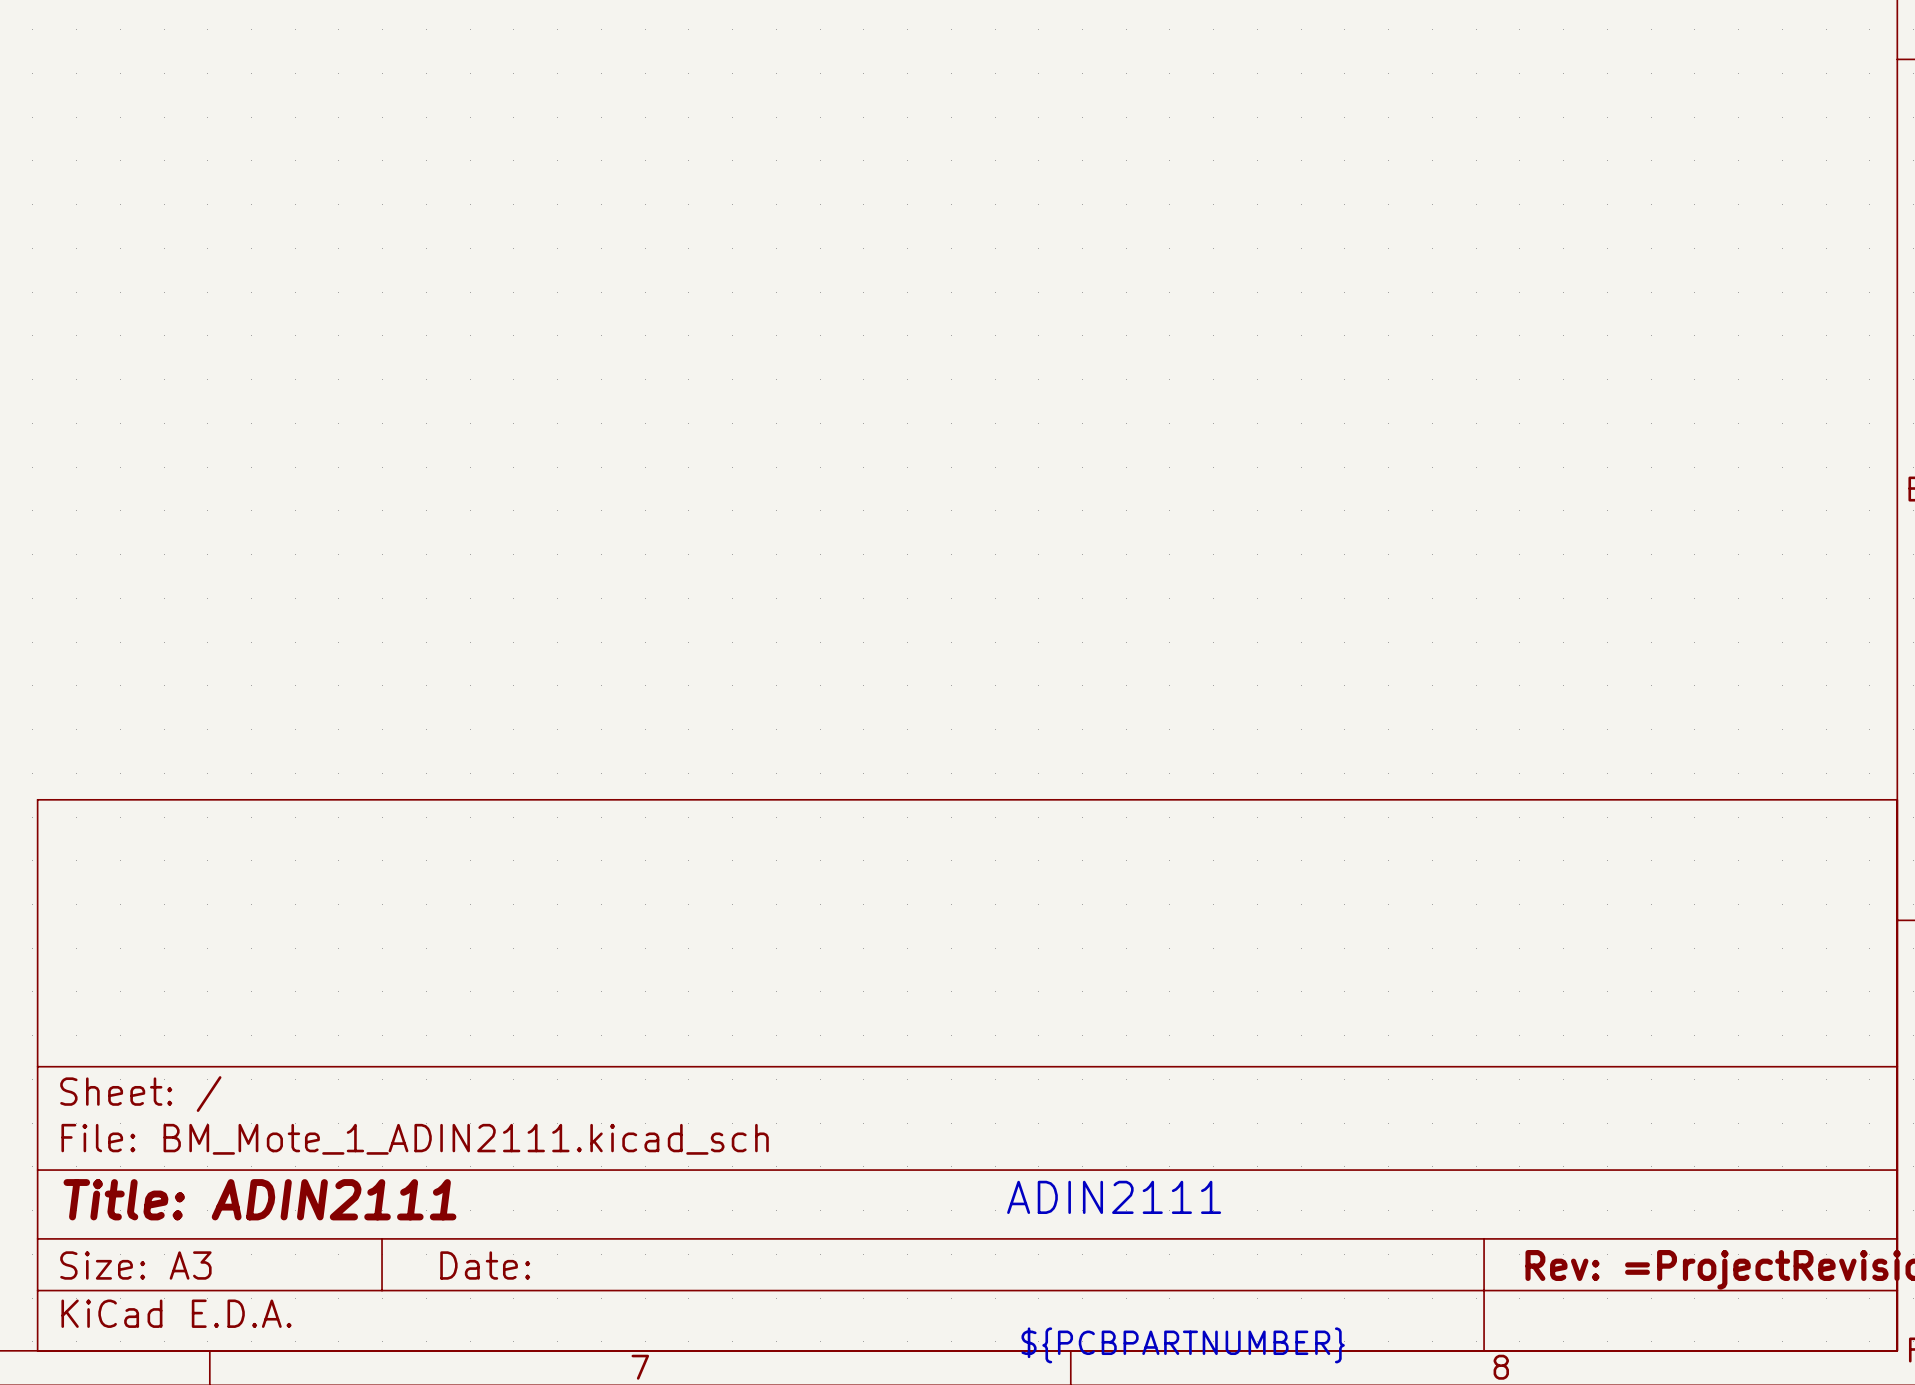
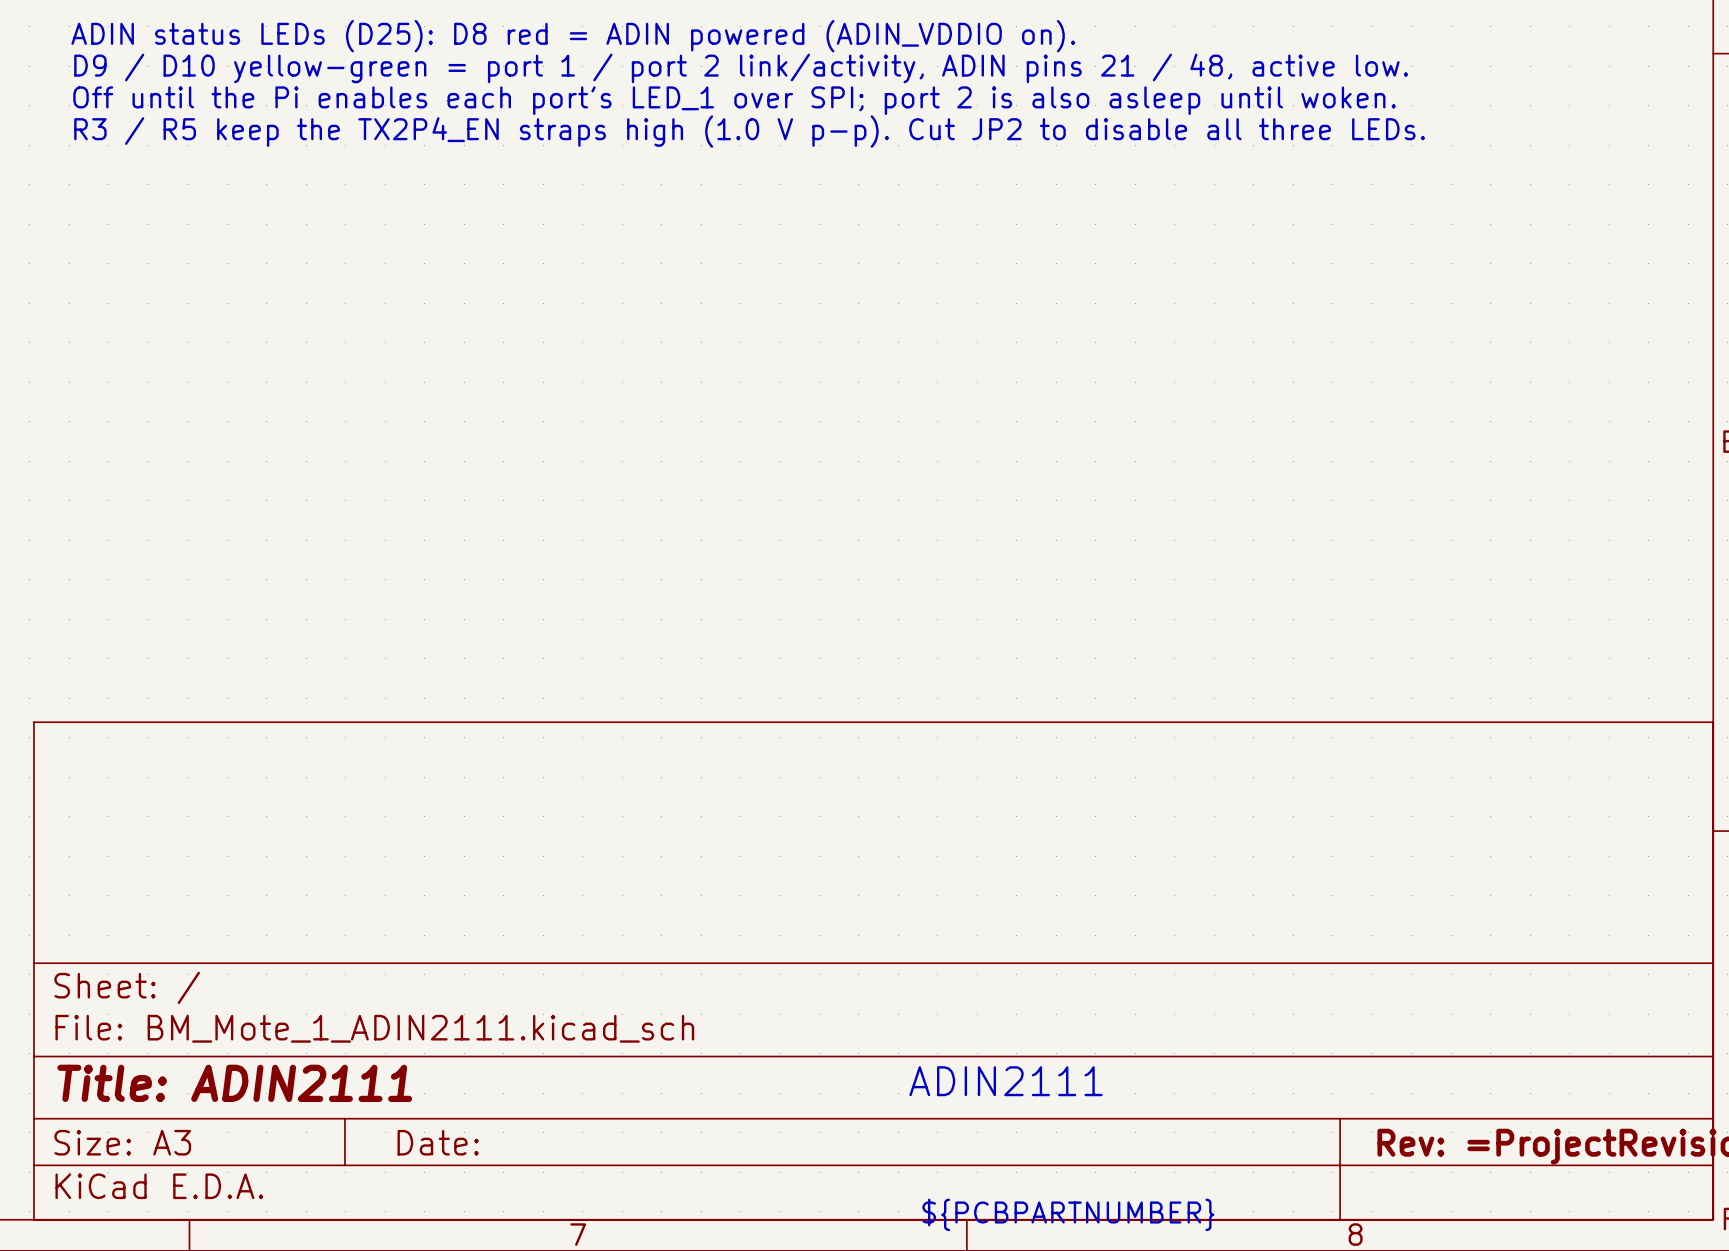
text: none -> ADIN status LEDs (D25): D8 red = ADIN powered (ADIN_VDDIO on). (573, 36)
text: none -> D9 / D10 yellow-green = port 1 / port 2 link/activity, ADIN pins 21 / 48, active low. (741, 68)
text: none -> Off until the Pi enables each port's LED_1 over SPI; port 2 is also asleep until woken. (734, 100)
text: none -> R3 / R5 keep the TX2P4_EN straps high (1.0 V p-p). Cut JP2 to disable all three LEDs. (749, 131)

